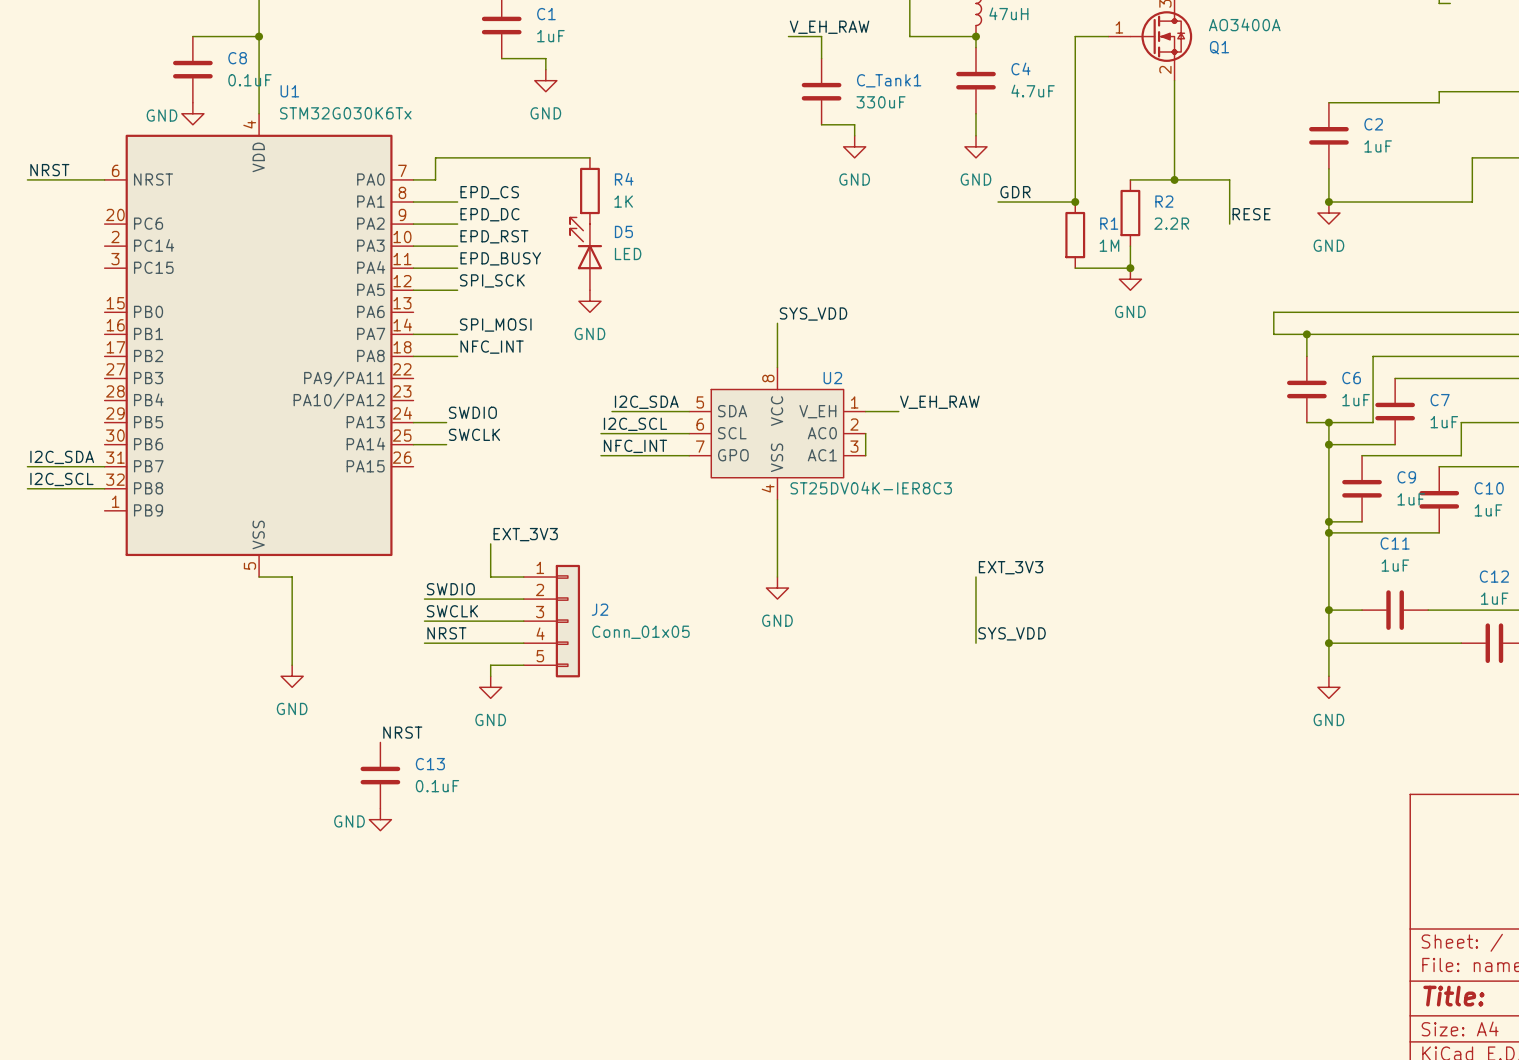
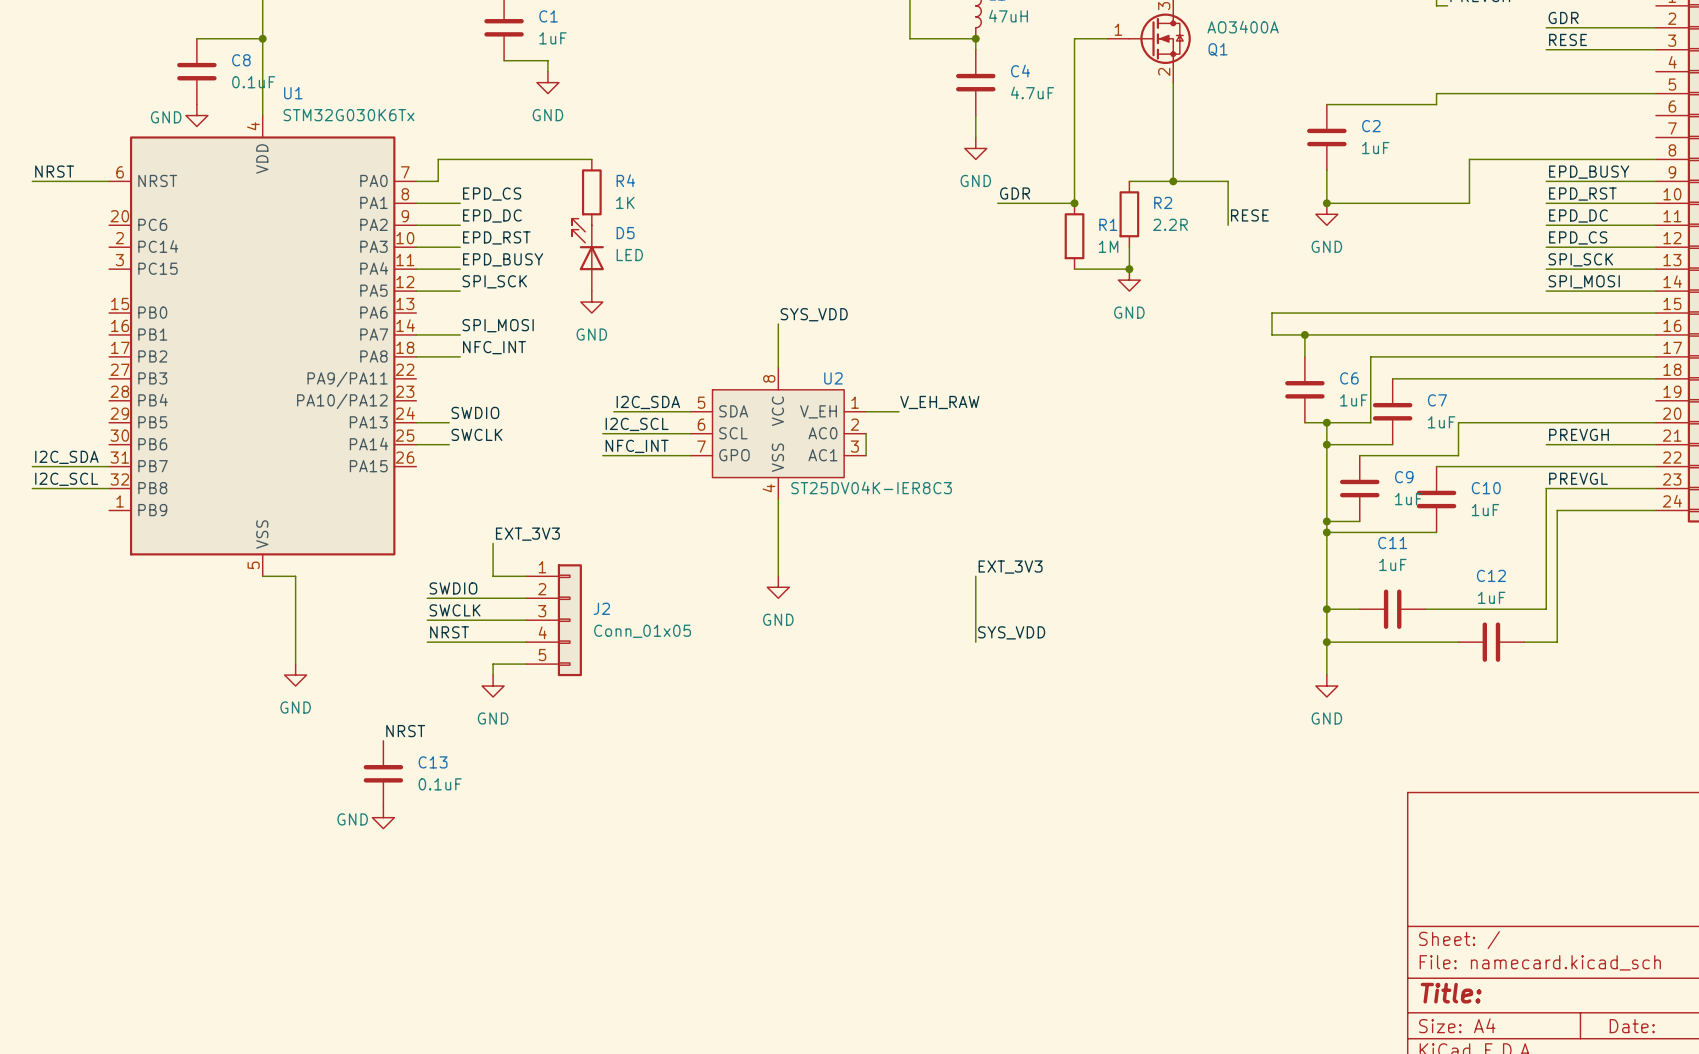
label: V_EH_RAW (829, 27) -> none
wire: (788, 36) (821, 36) (821, 58) -> none
C_Tank1: 330uF (821, 91) -> none
wire: (821, 124) (854, 124) (854, 135) -> none
power symbol: GND (854, 146) -> none

